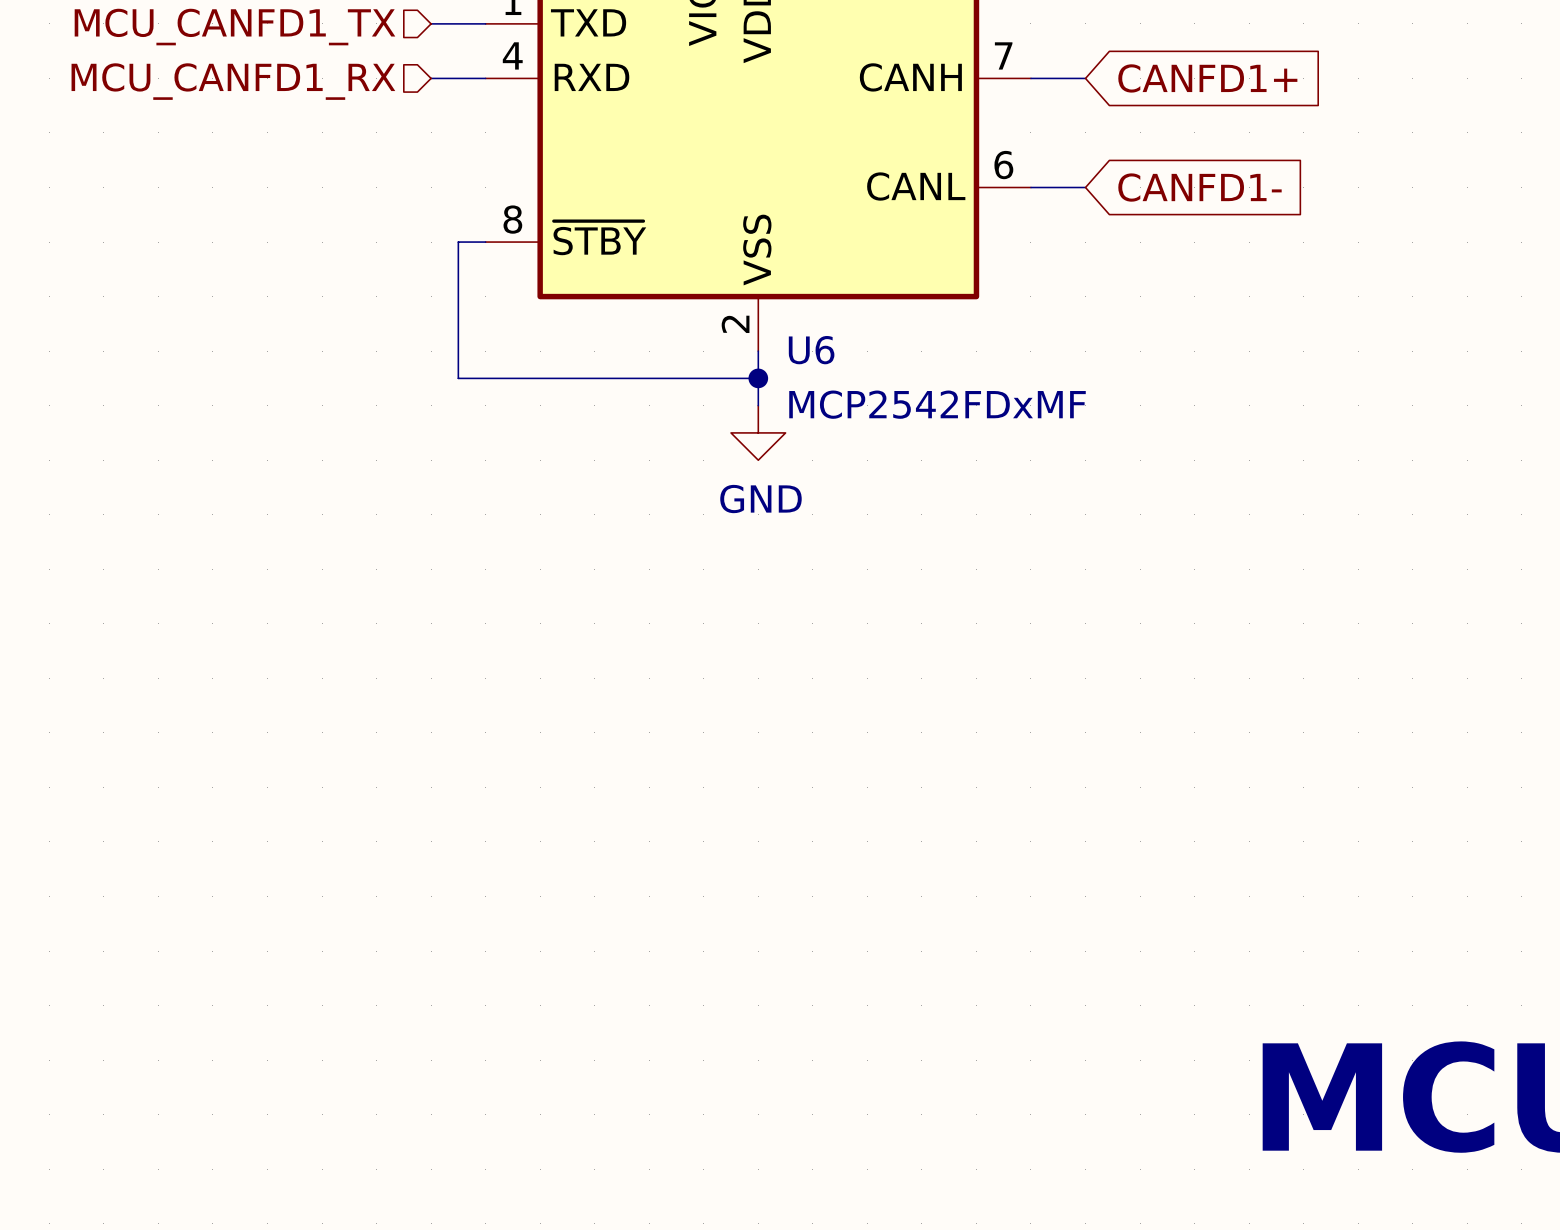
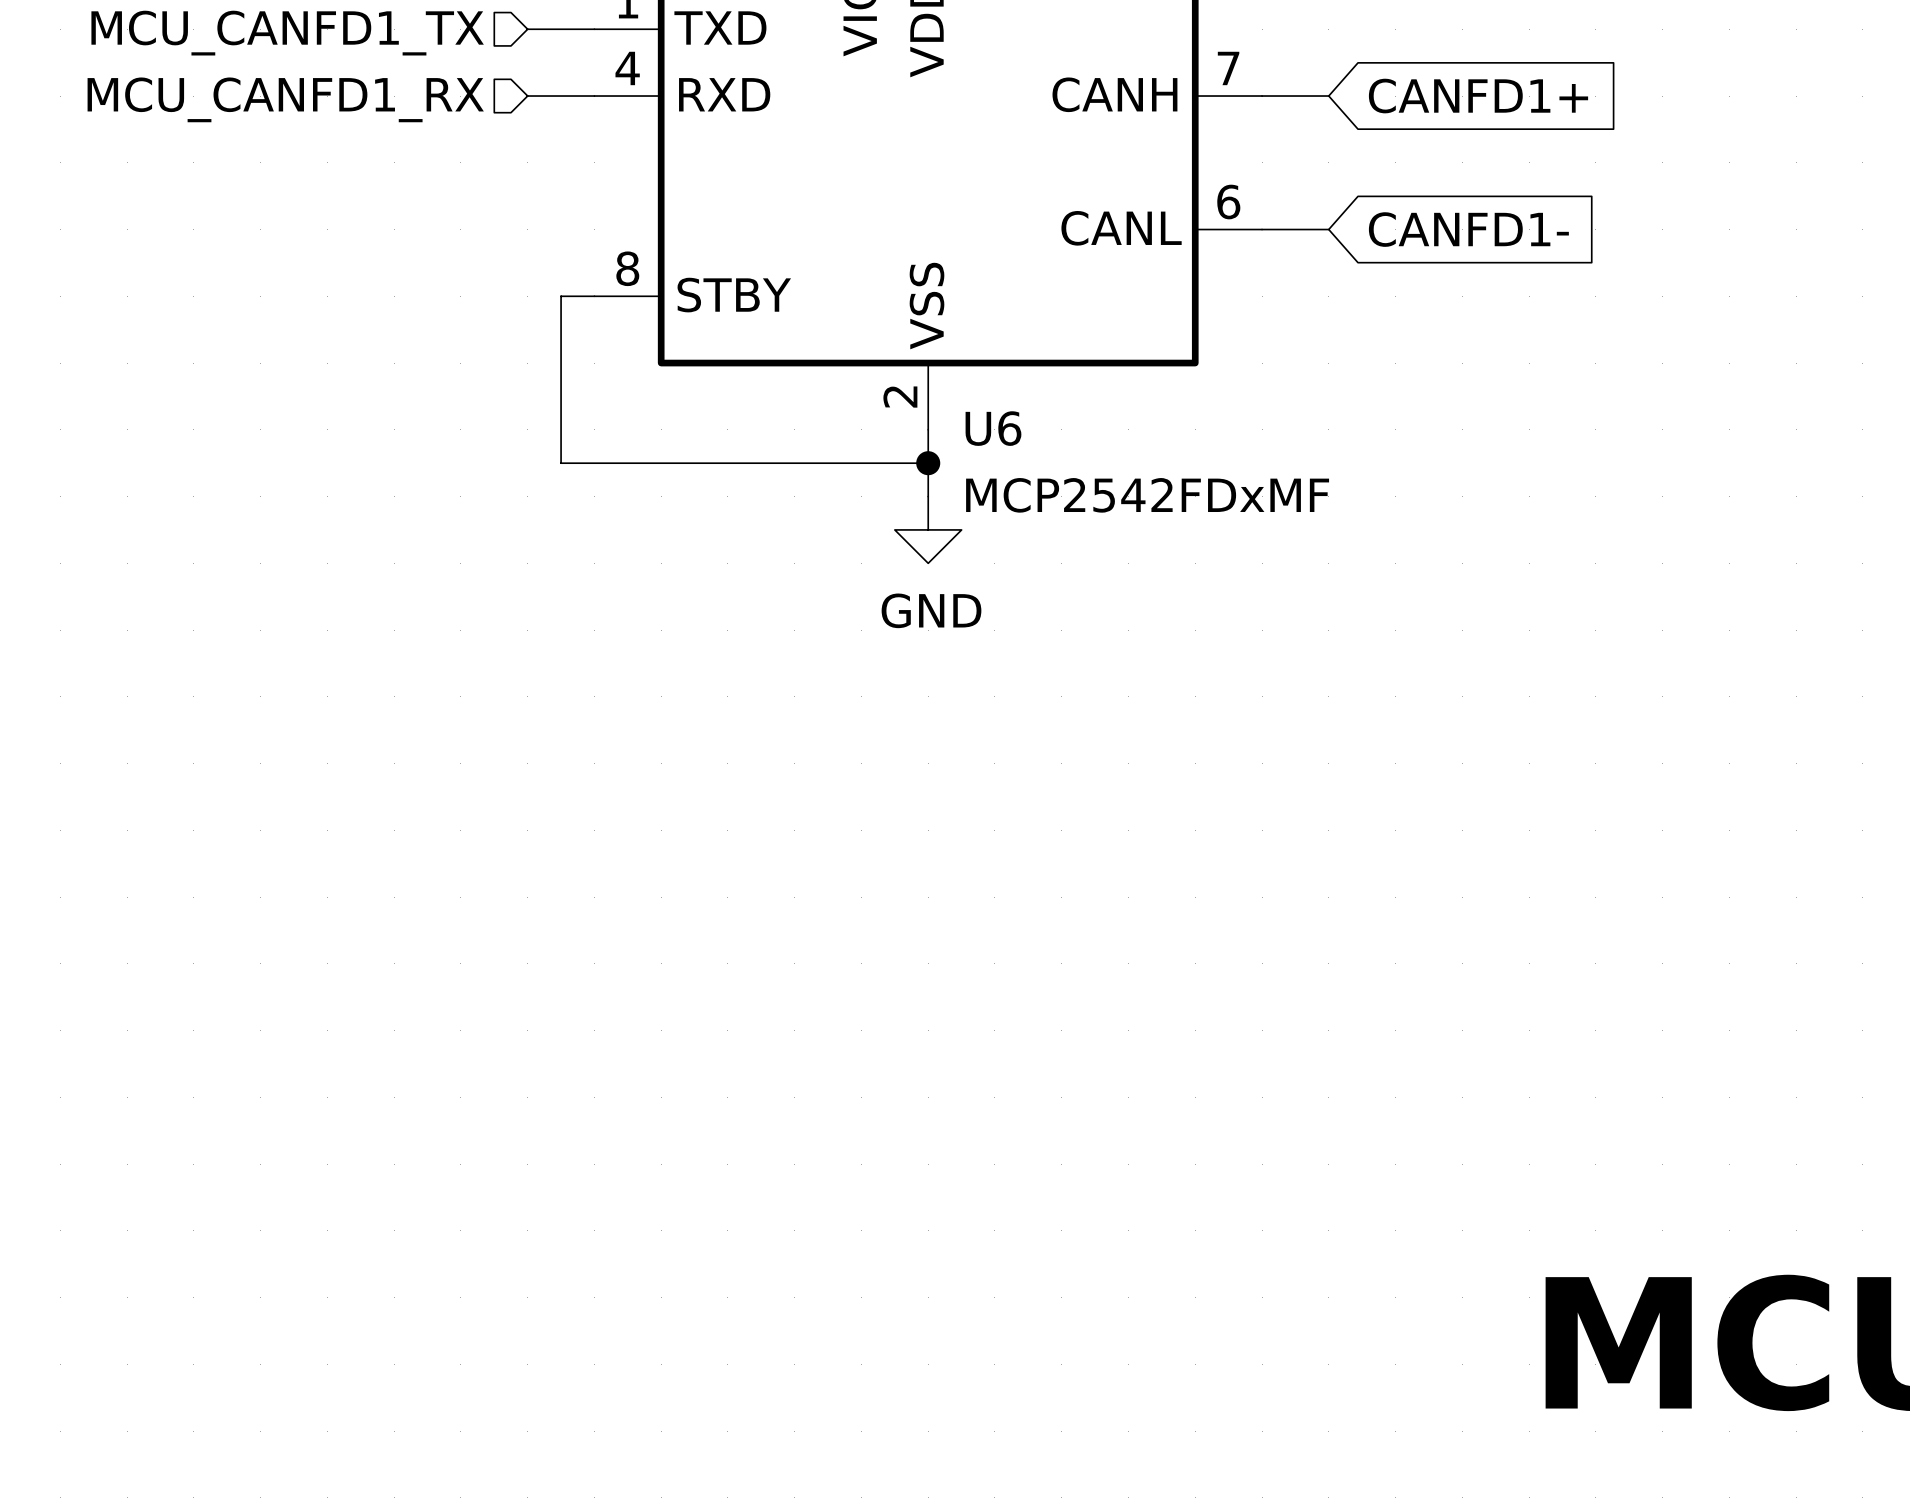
U6 pin name: ~{STBY} (599, 238) -> STBY (734, 295)

